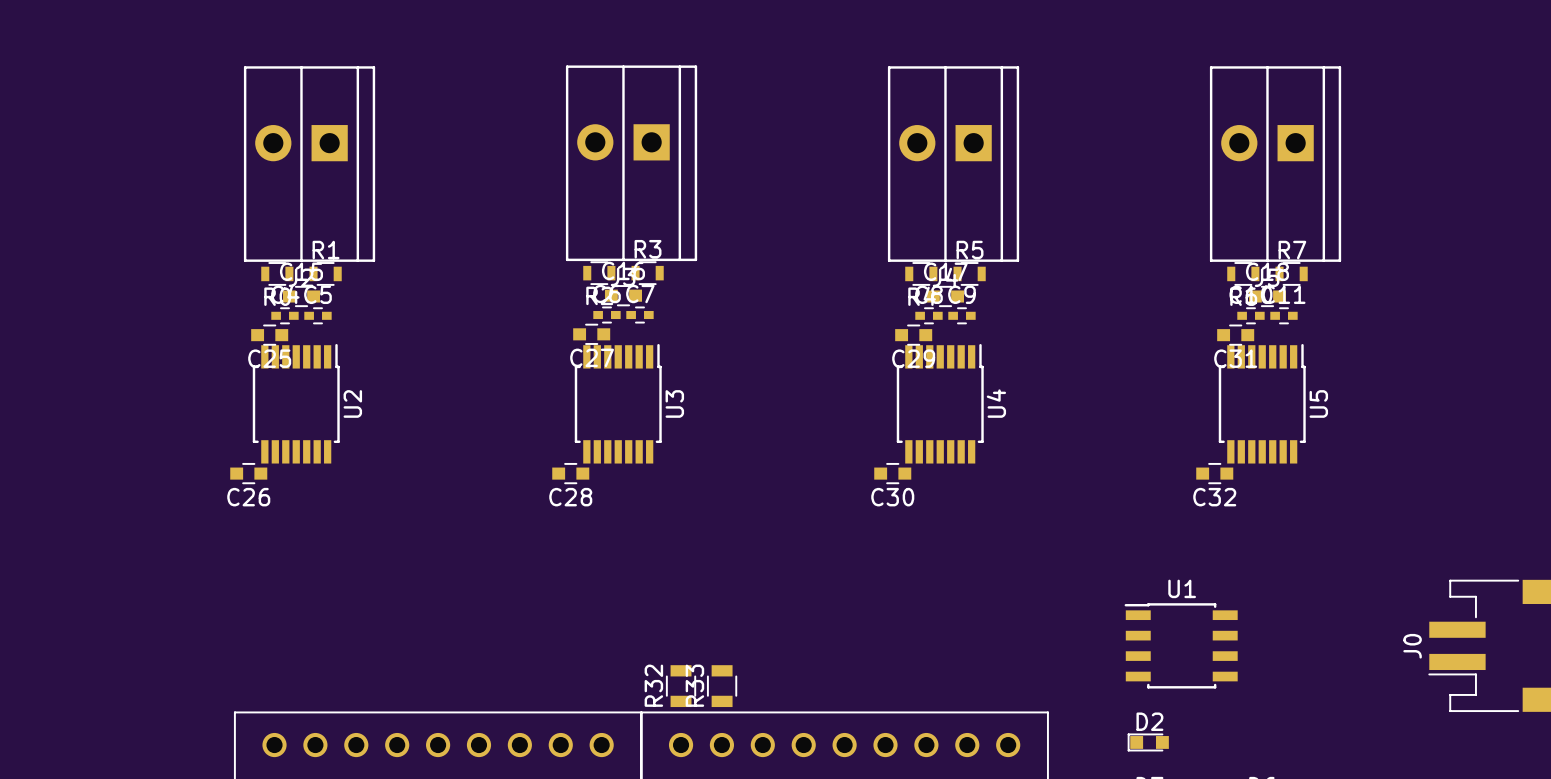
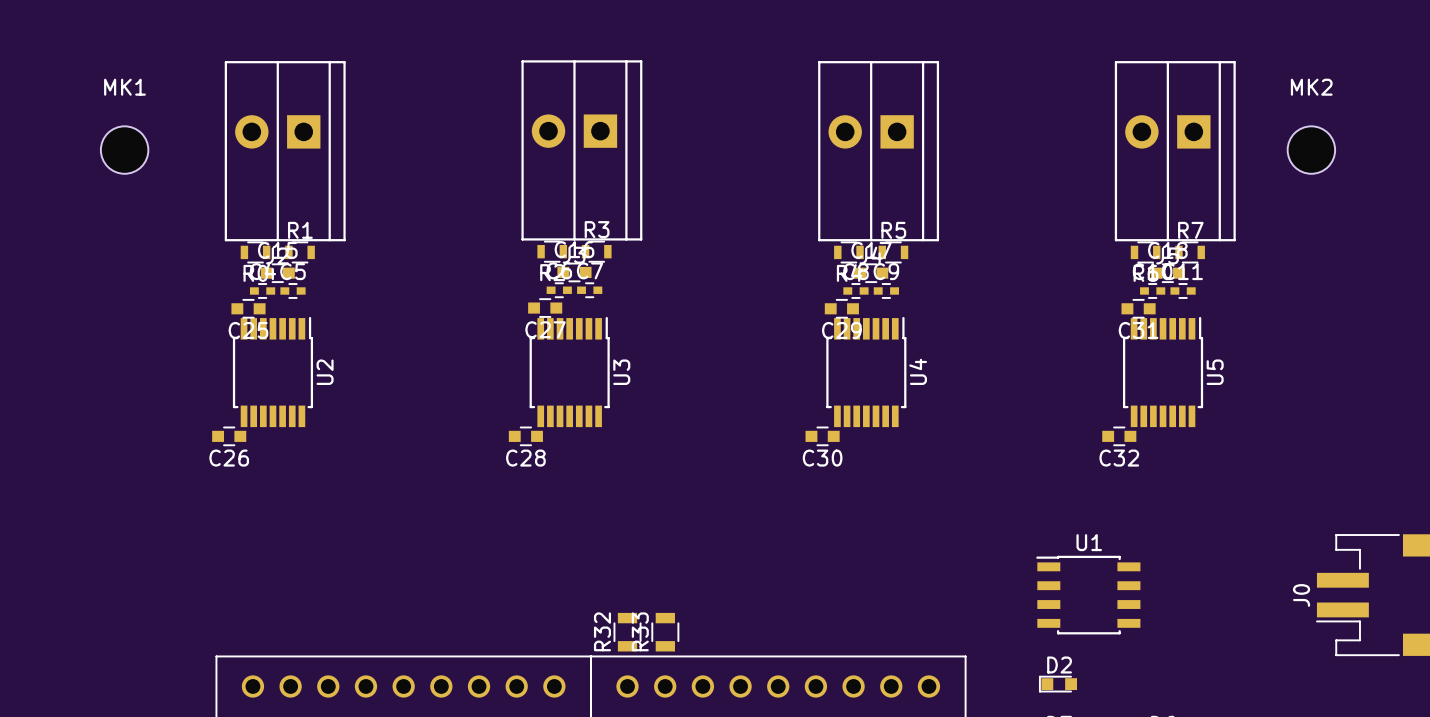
MK1: none -> (124, 150)
MK2: none -> (1311, 150)

